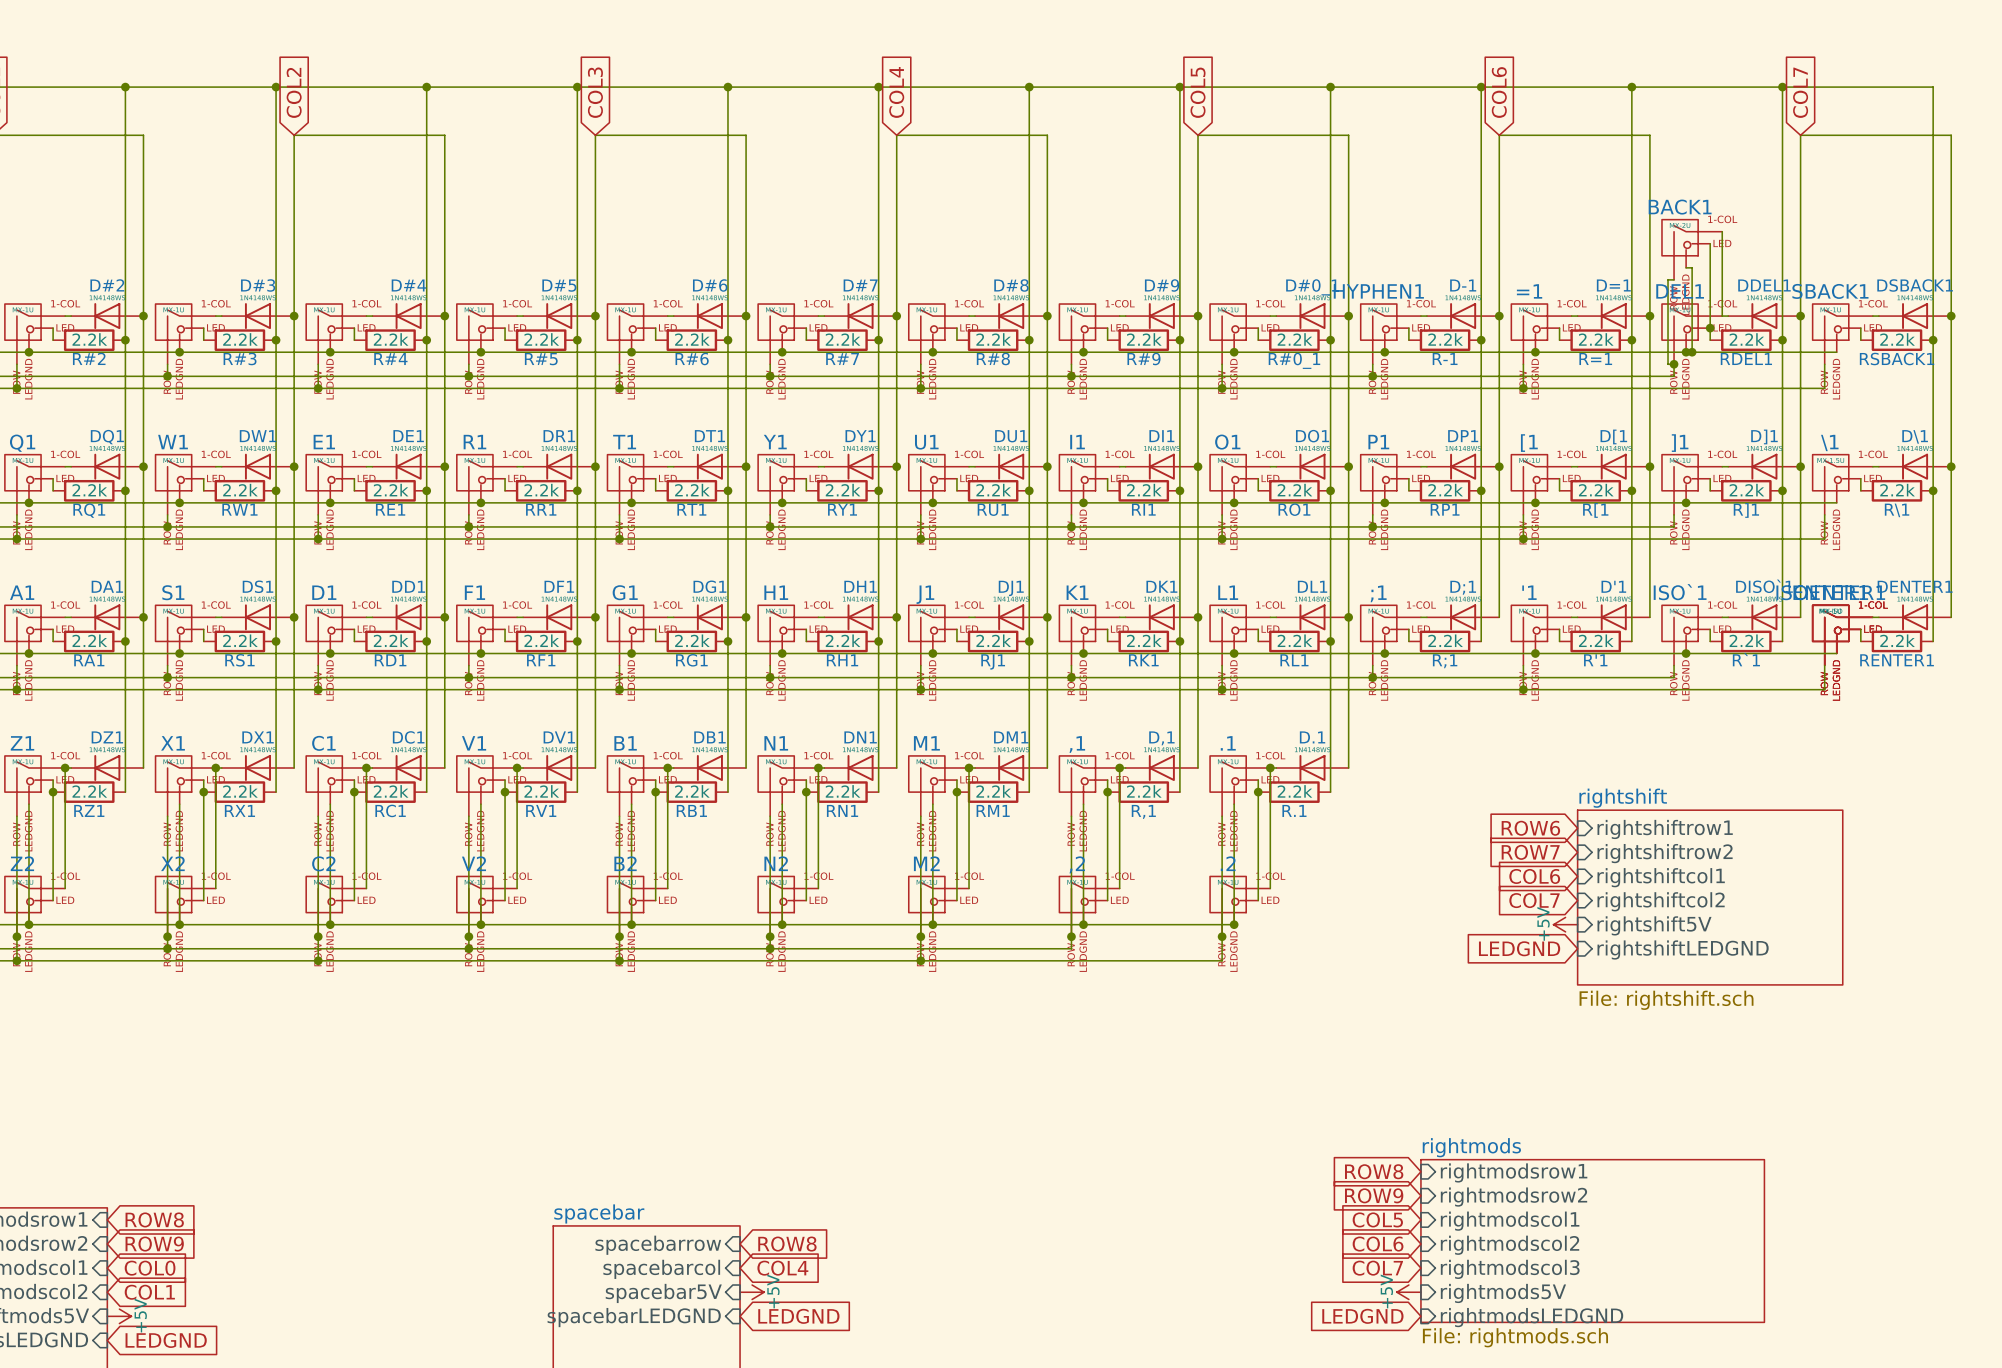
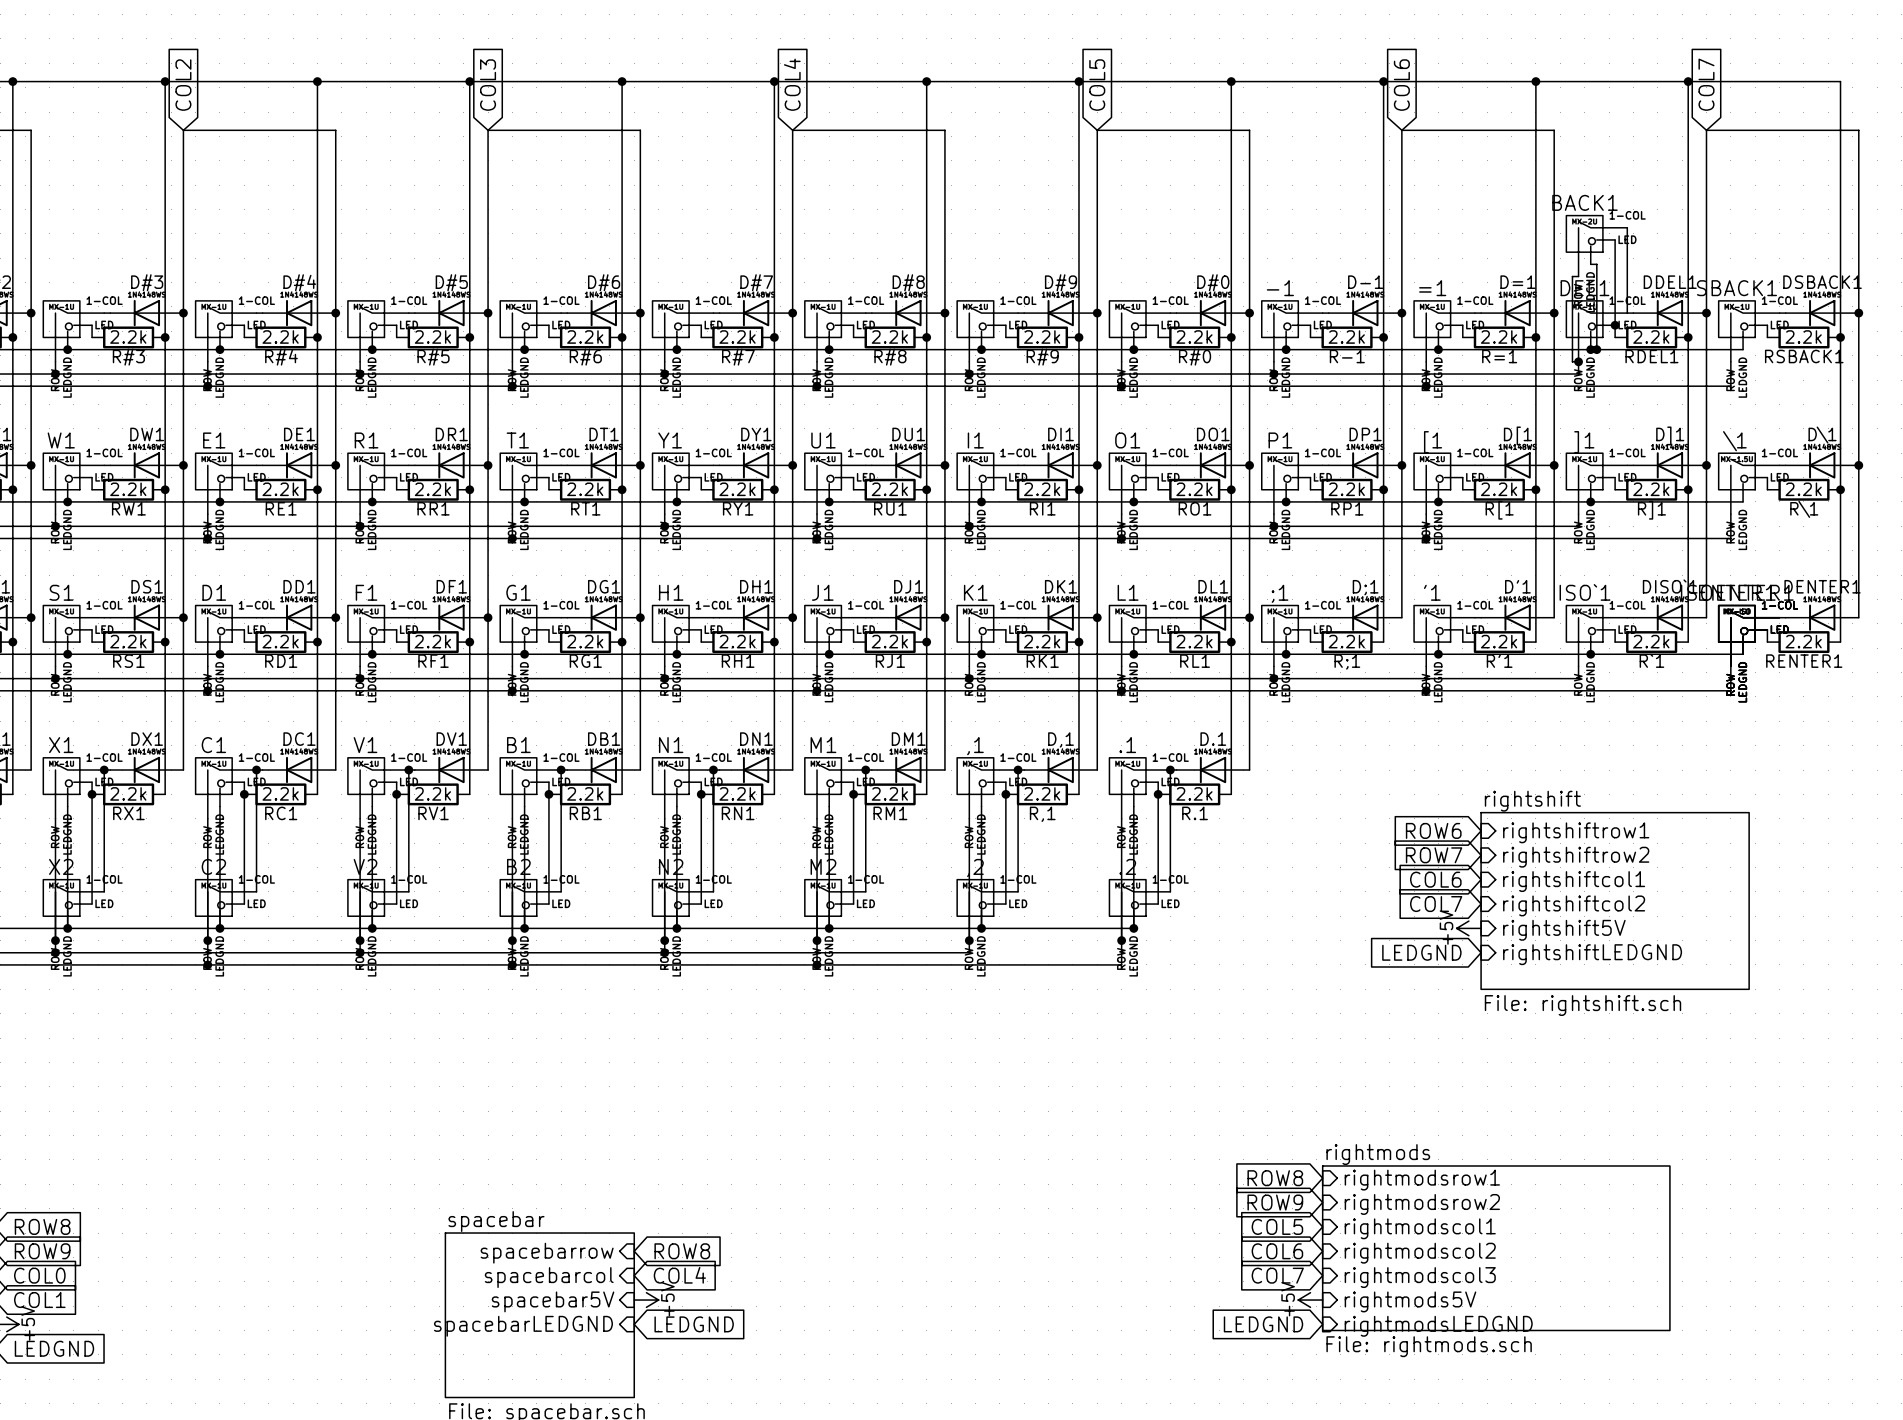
D#0_1 name: D#0_1 (1312, 287) -> D#0 (1213, 282)
HYPHEN1 name: HYPHEN1 (1378, 291) -> -1 (1280, 288)
R#0_1 name: R#0_1 (1294, 360) -> R#0 (1195, 357)

